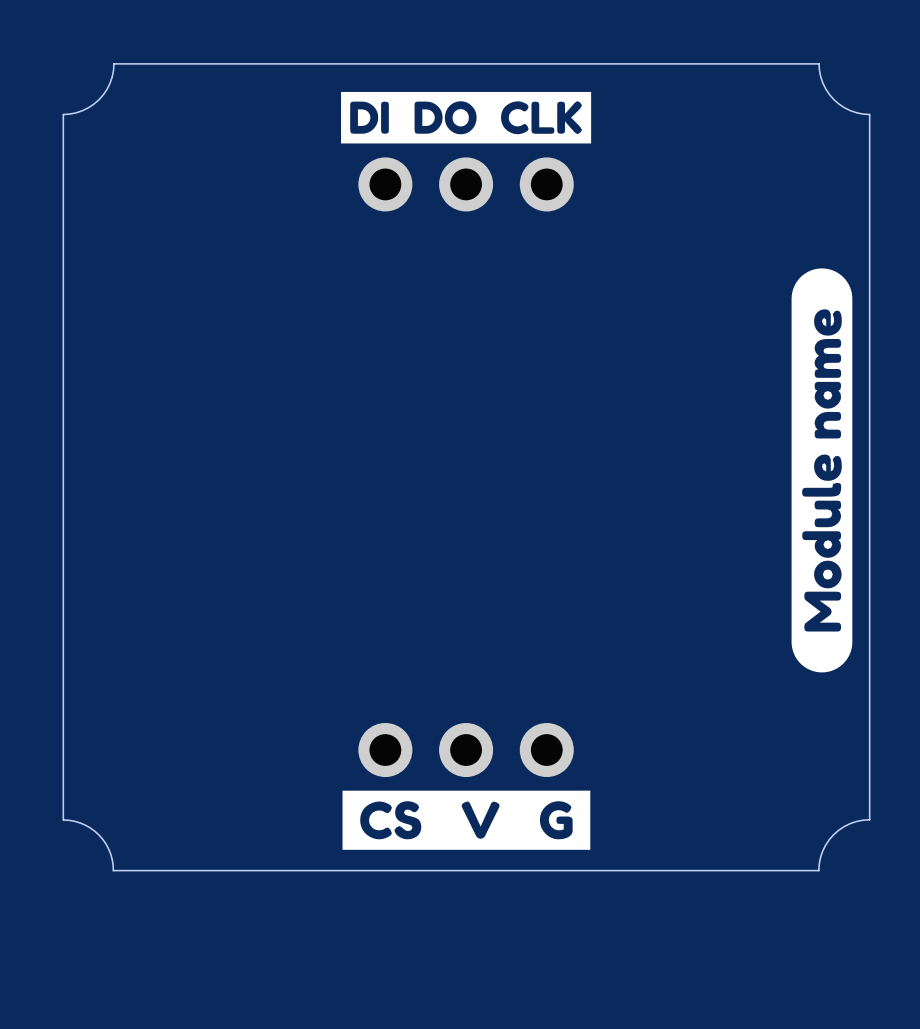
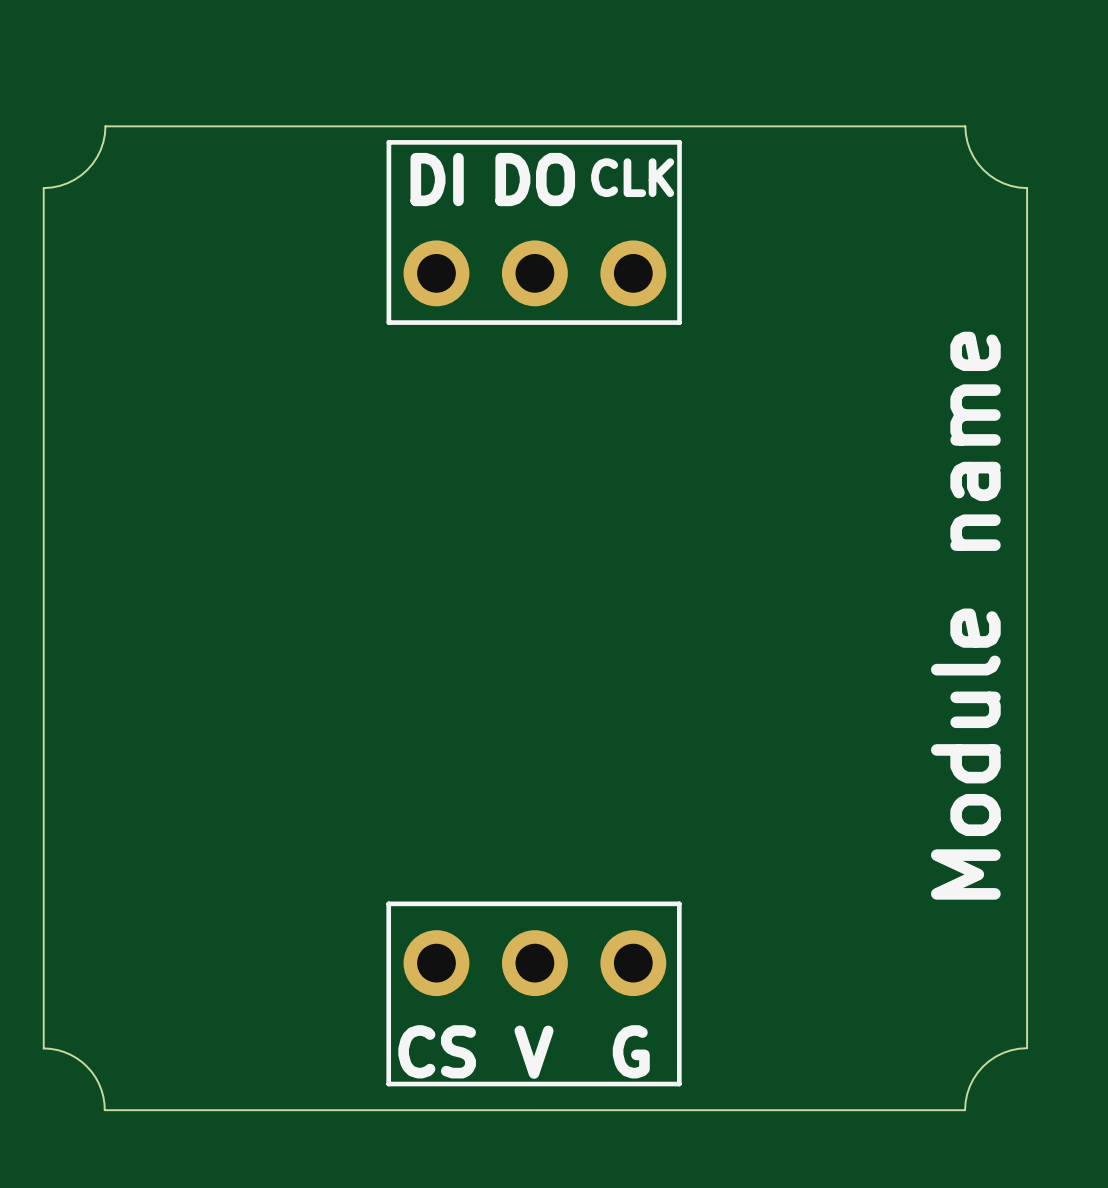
line: none -> (388, 142) (388, 322) (679, 322) (679, 142) (388, 142)
drawing: [341, 91, 592, 144] -> none
text: none -> CLK (632, 177)
text: none -> DI (437, 179)
text: none -> DO (535, 179)
drawing: [791, 268, 853, 673] -> none
text: none -> Module name (965, 615)
line: none -> (388, 903) (388, 1084) (679, 1084) (679, 903) (388, 903)
drawing: [342, 790, 591, 850] -> none
text: none -> CS (437, 1051)
text: none -> G (631, 1051)
text: none -> V (534, 1052)

